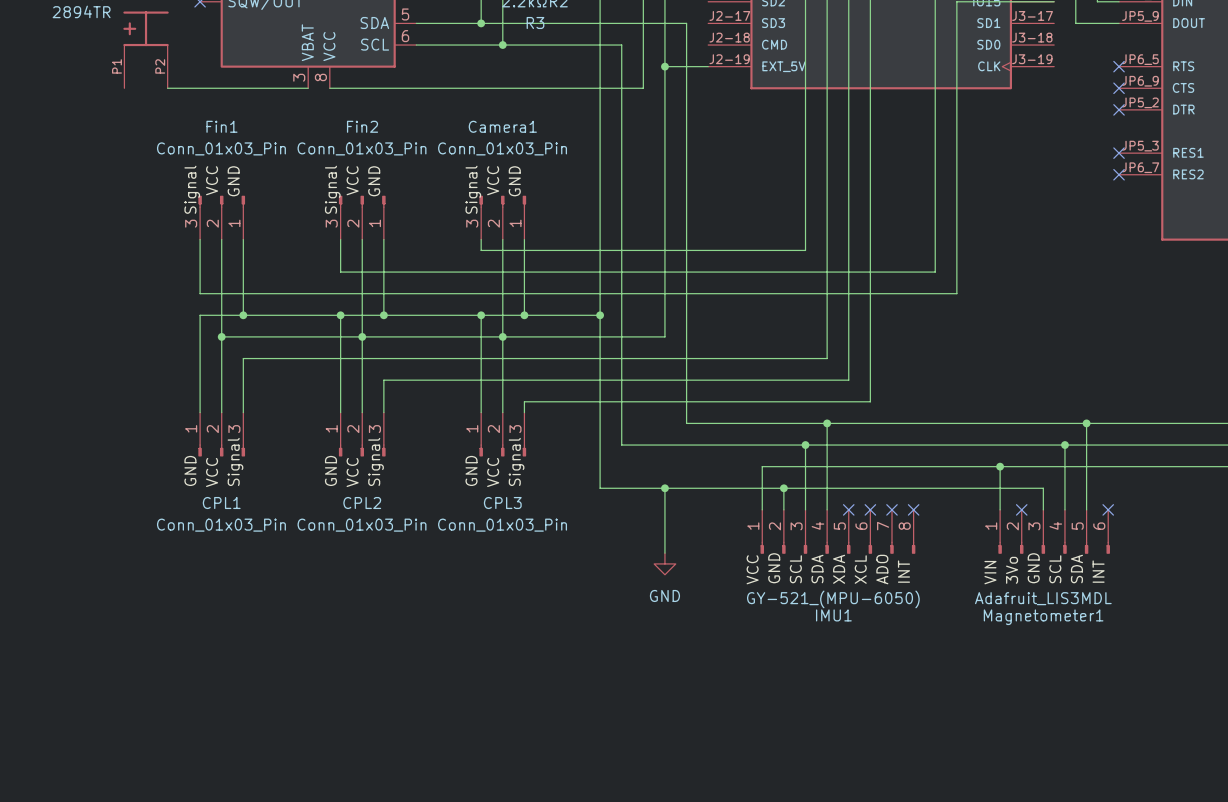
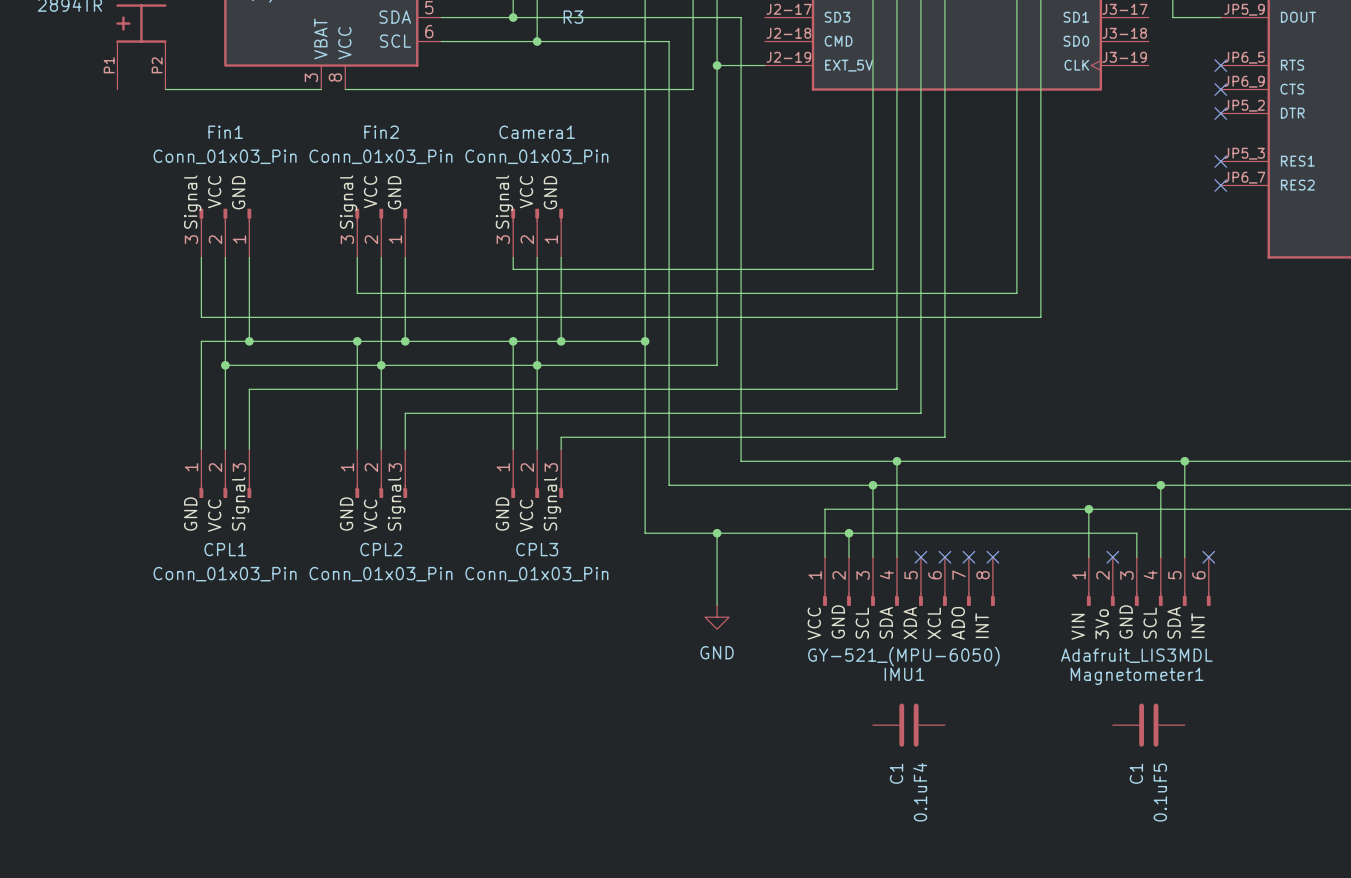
0.1uF4: none -> C1 (908, 725)
0.1uF5: none -> C1 (1148, 725)

